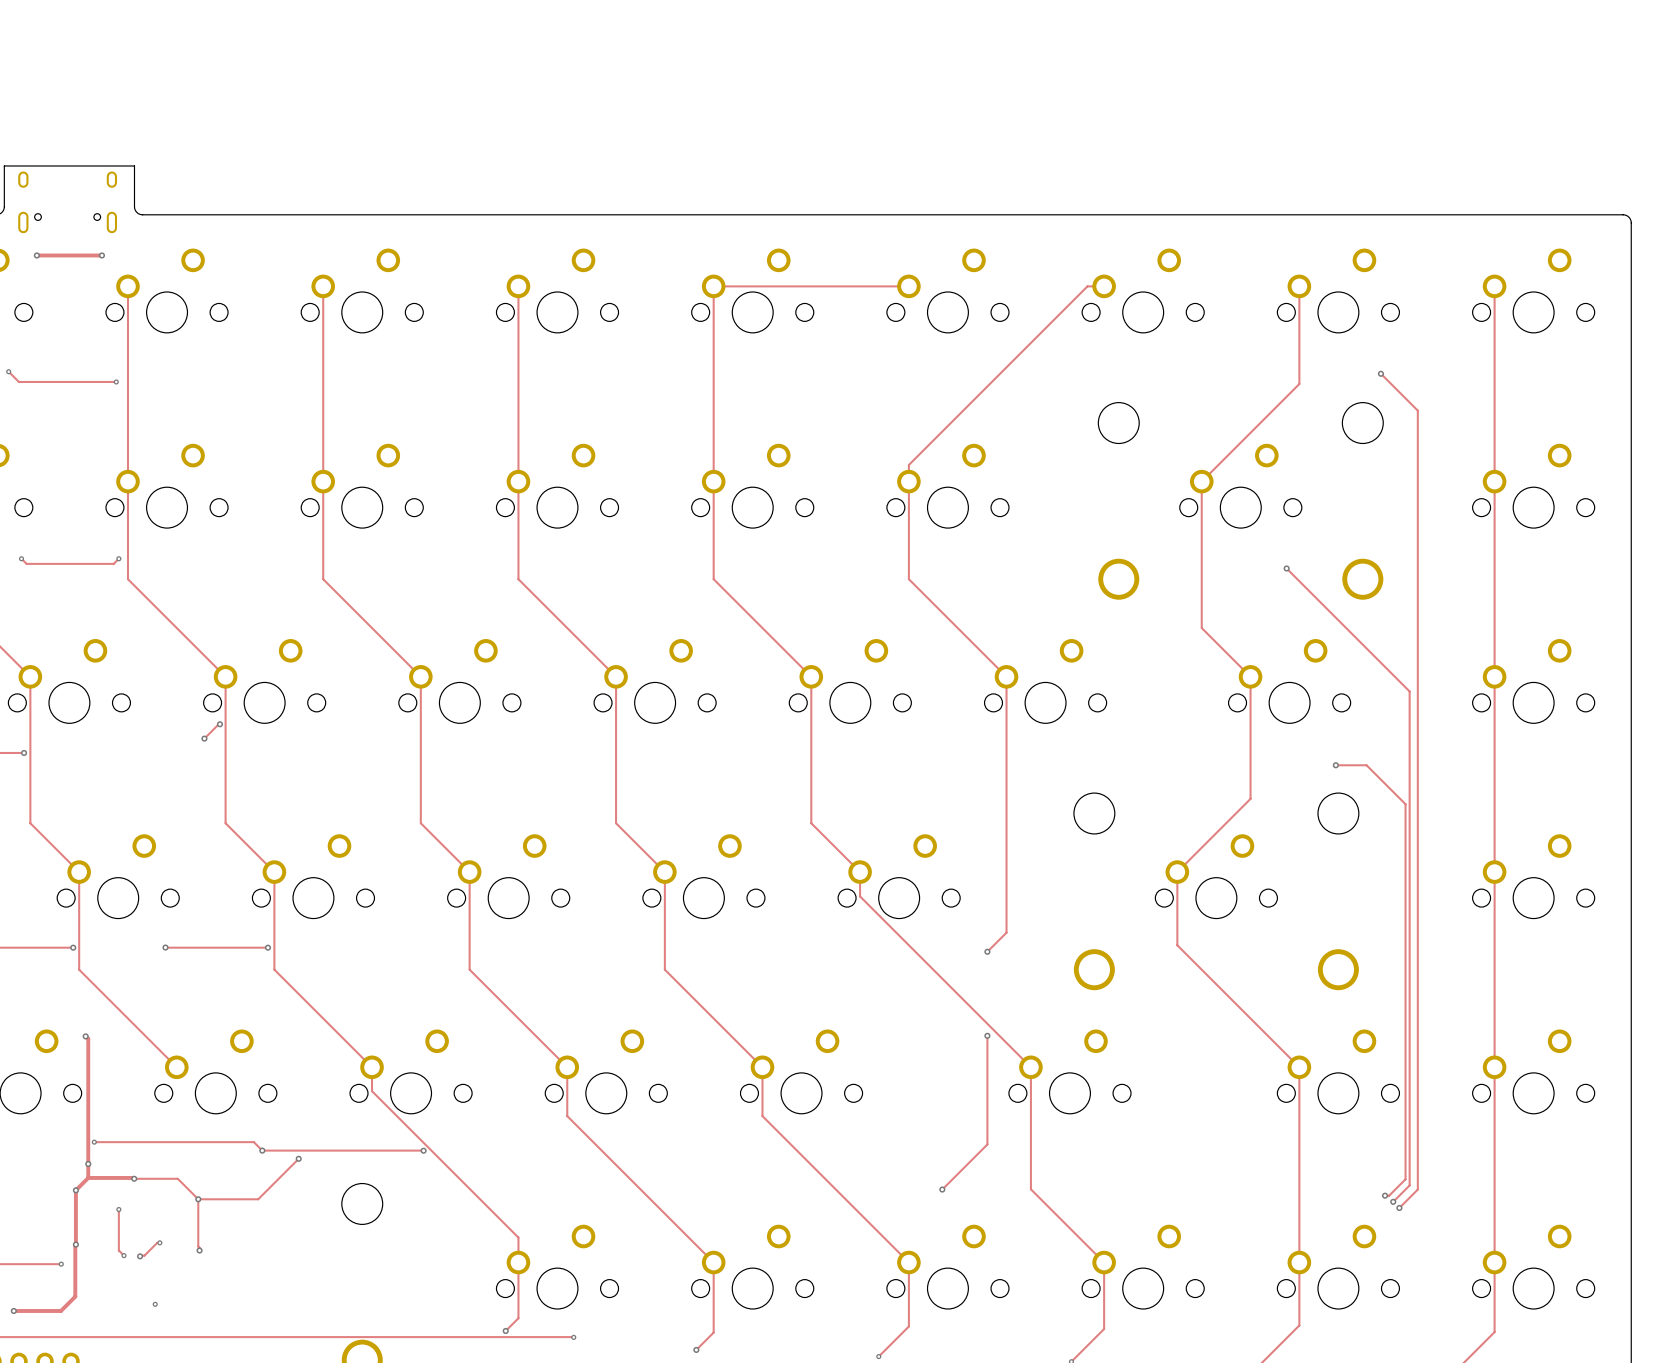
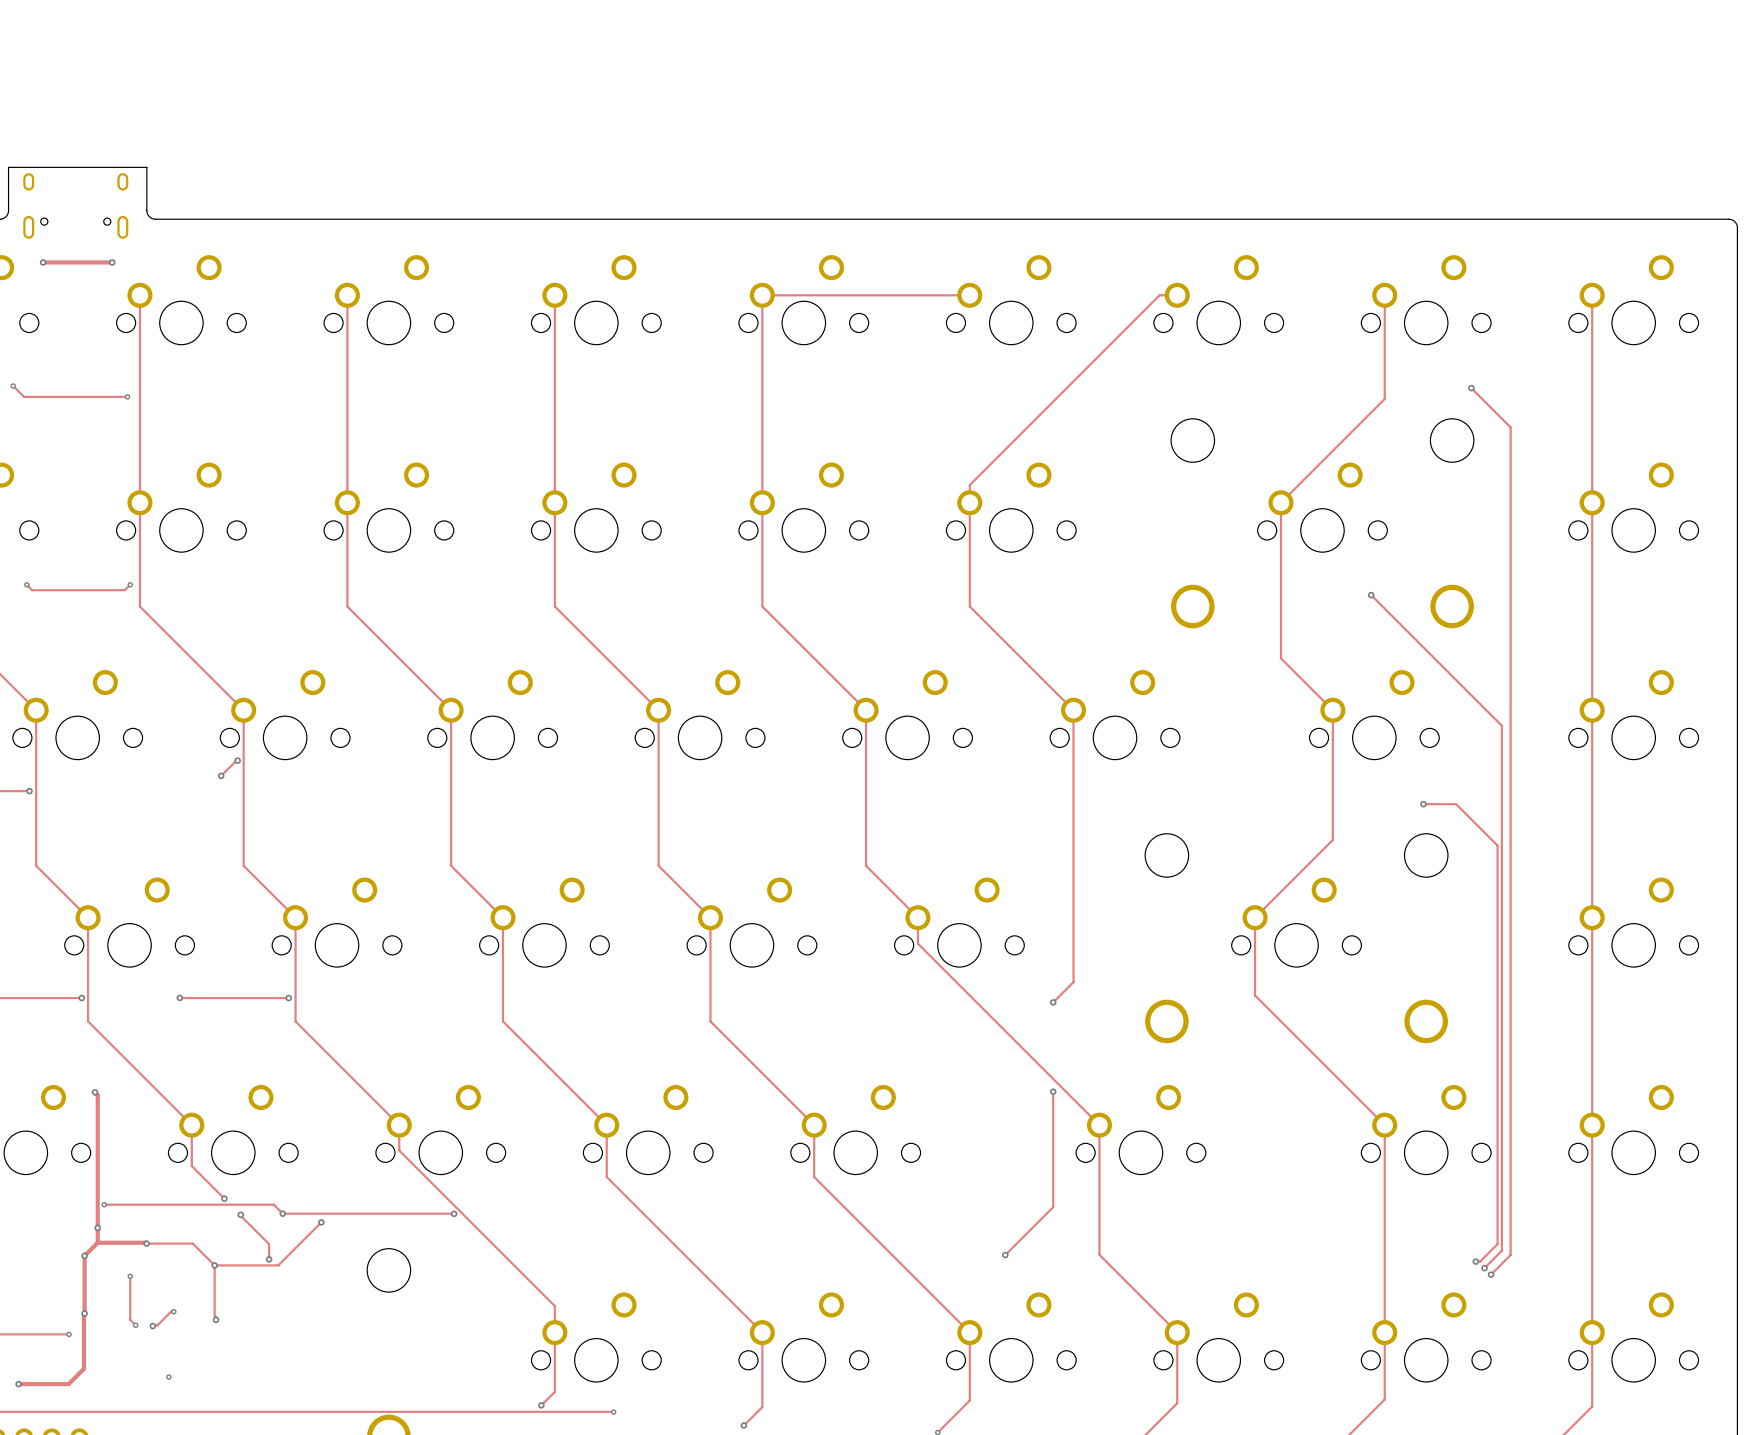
track: none -> (191, 1125) (191, 1166) (224, 1198)
via: none -> (224, 1198)
track: none -> (240, 1214) (269, 1244) (269, 1259)
via: none -> (240, 1214)
via: none -> (269, 1259)

